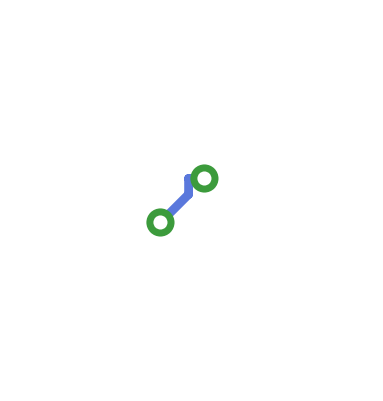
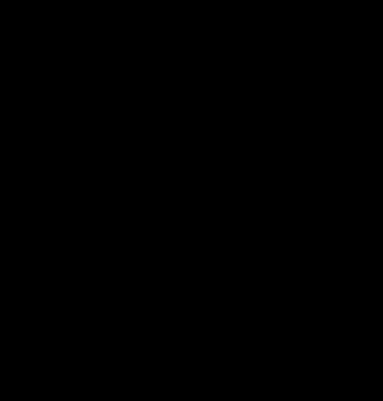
track: (204, 178) (188, 178) (188, 194) (160, 222) -> none
via: (204, 178) -> none
via: (160, 222) -> none

